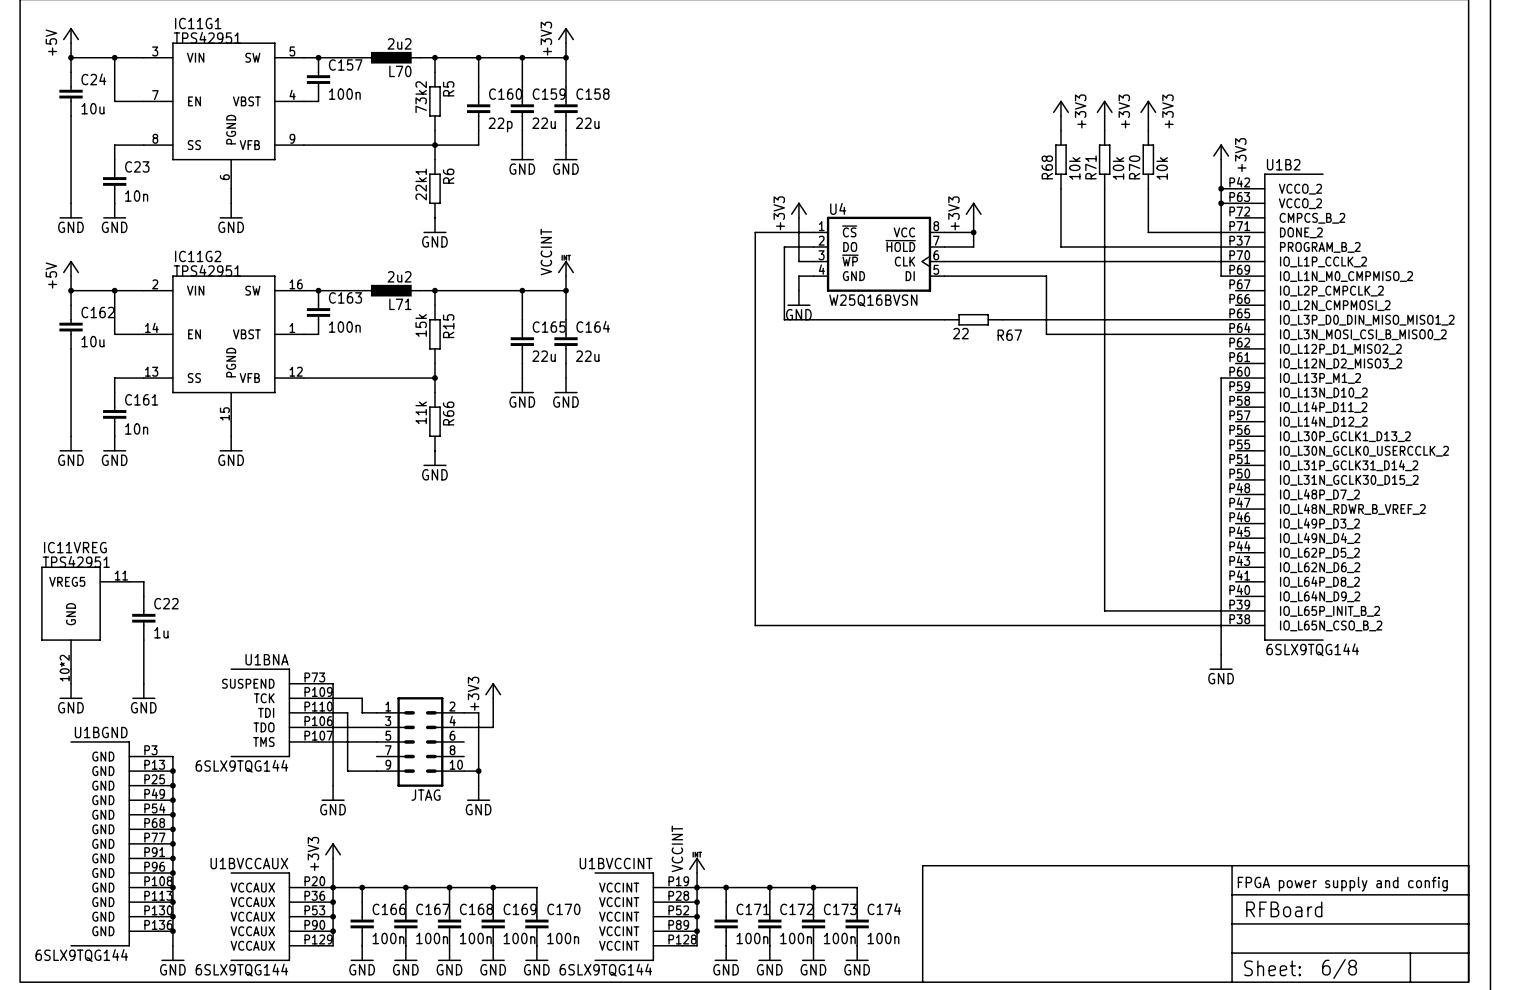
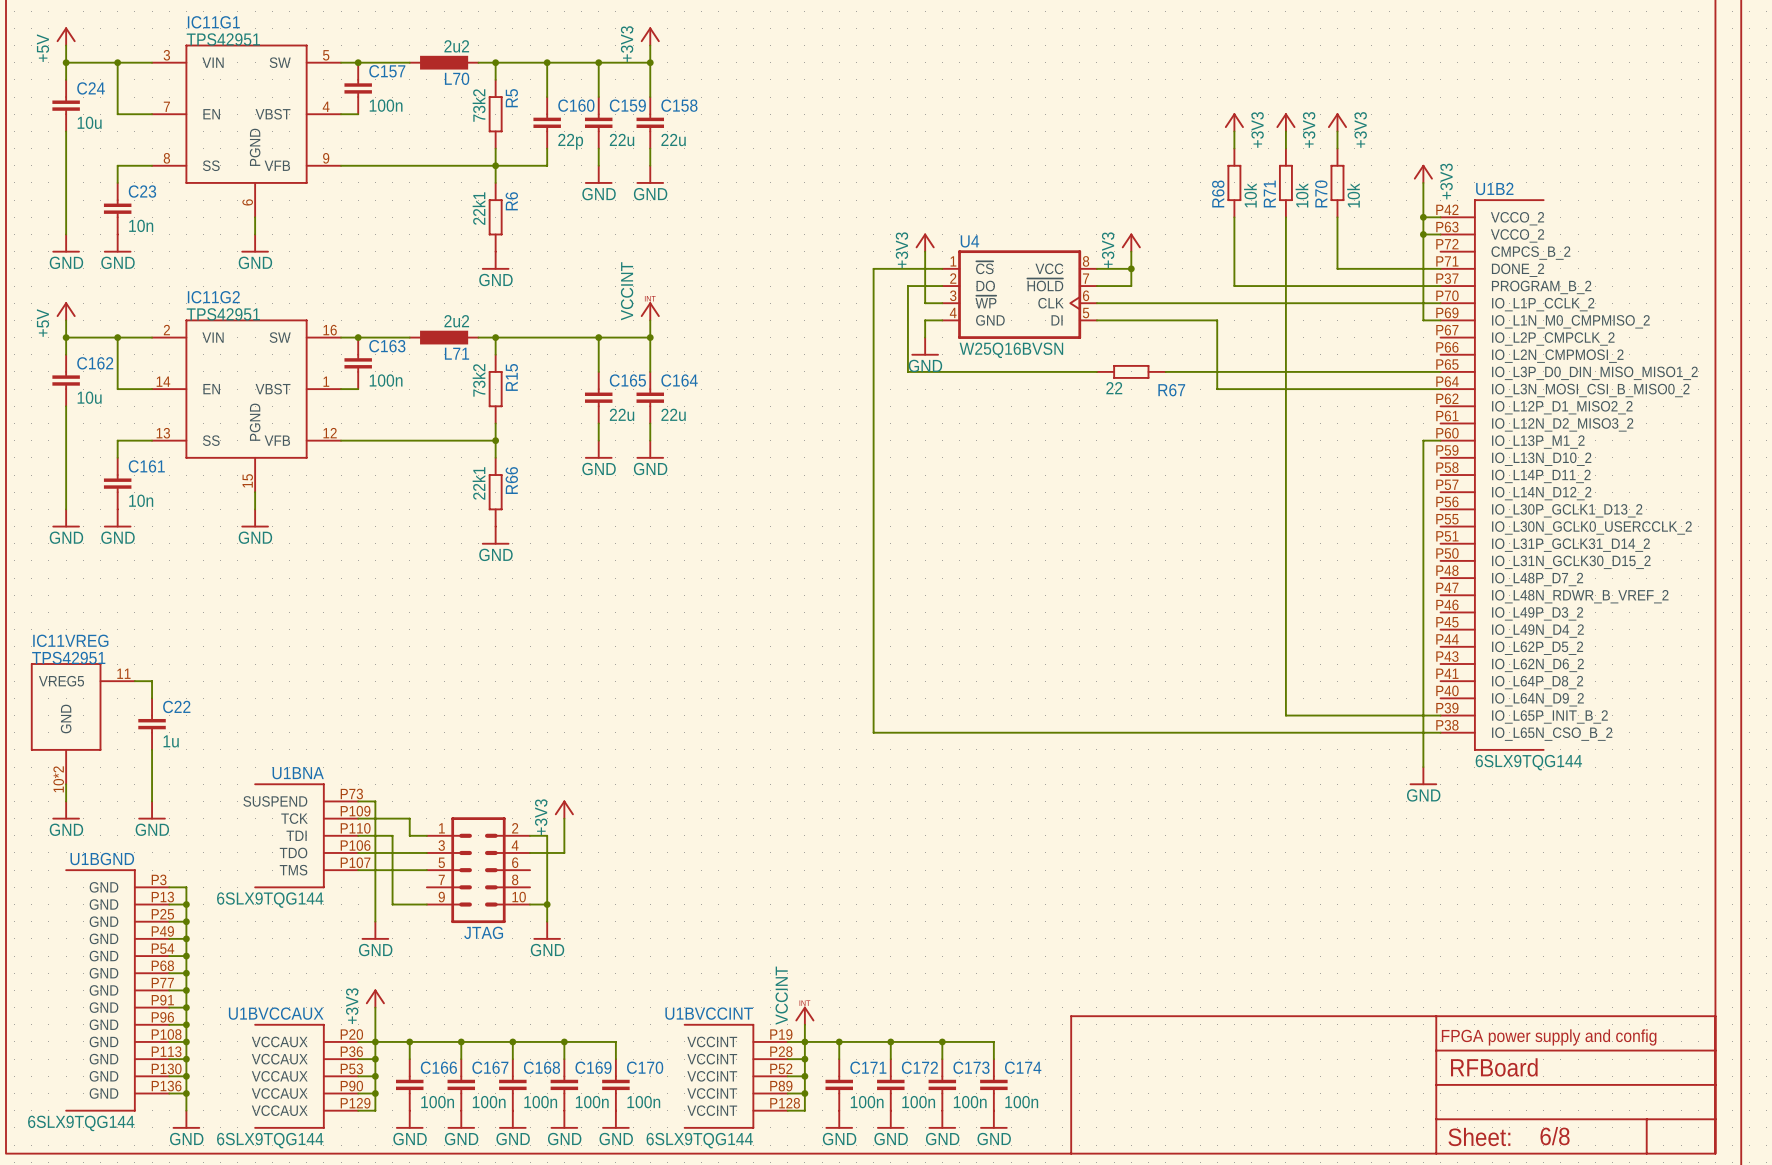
R15 value: 15k (421, 325) -> 73k2 (479, 380)
R66 value: 11k (421, 412) -> 22k1 (479, 483)

